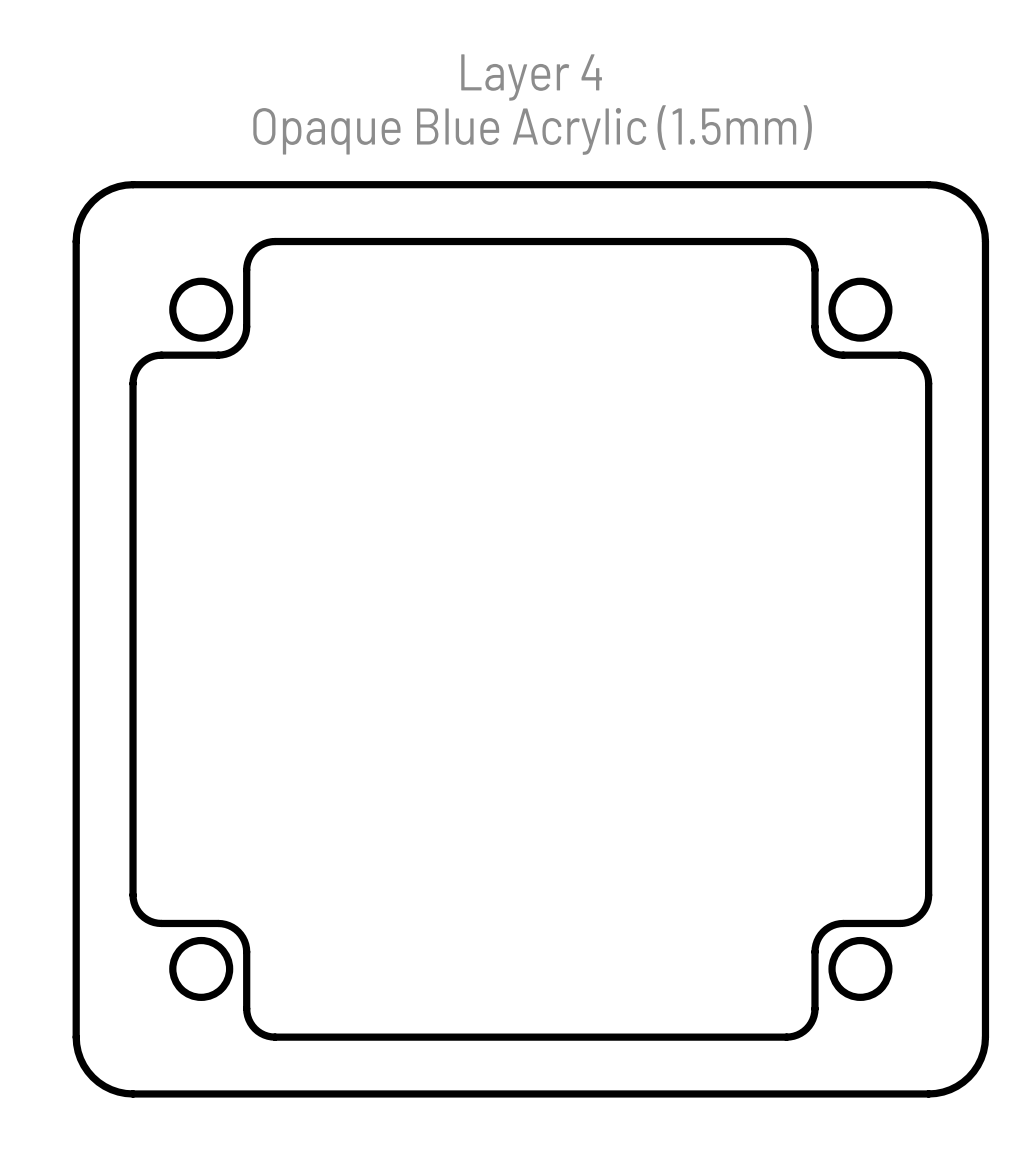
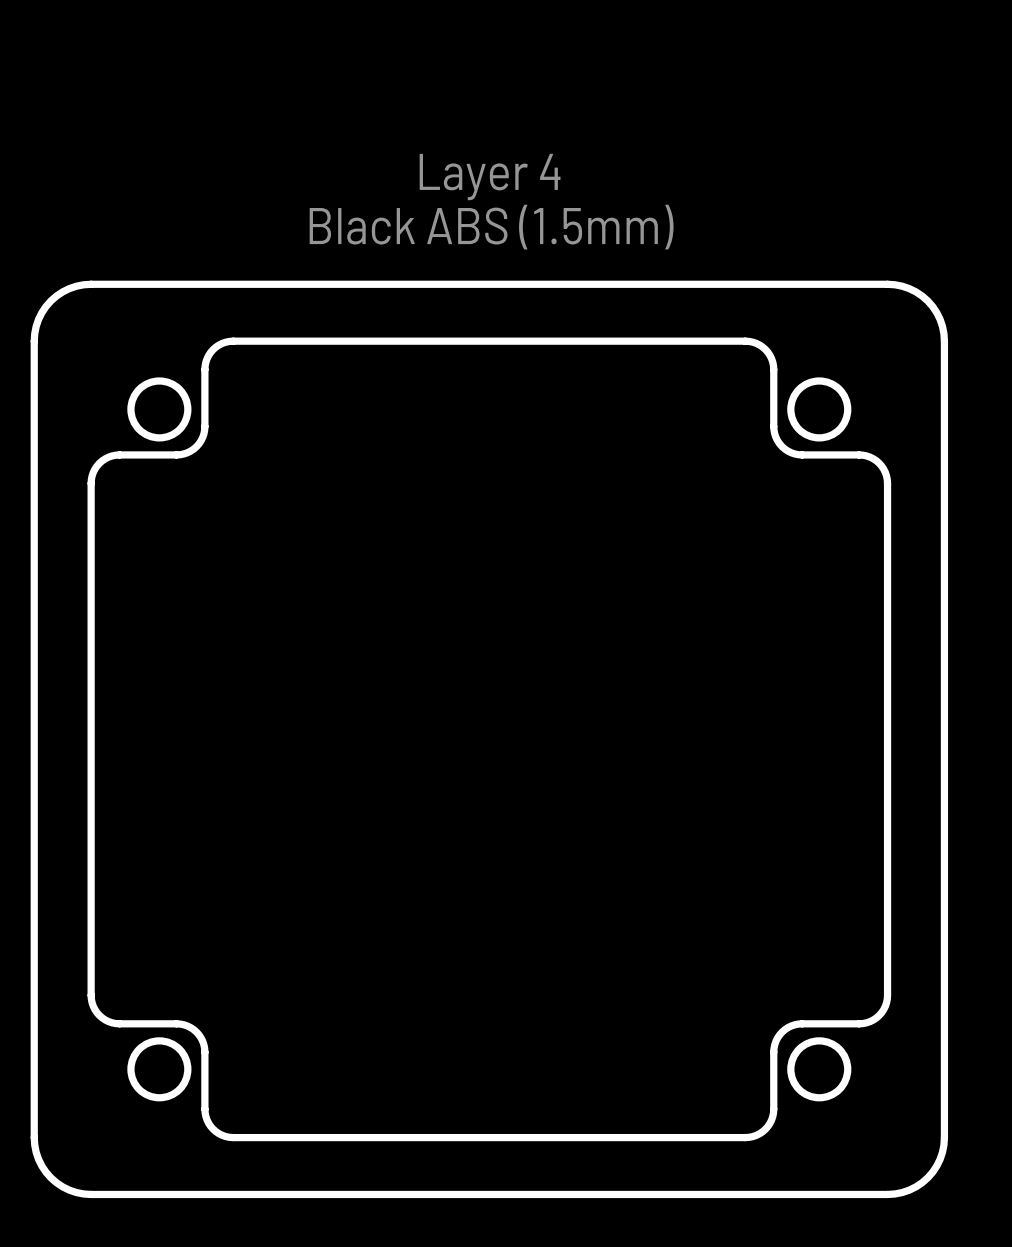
text: Opaque Blue Acrylic (1.5mm) (532, 130) -> Black ABS (1.5mm) (491, 227)

